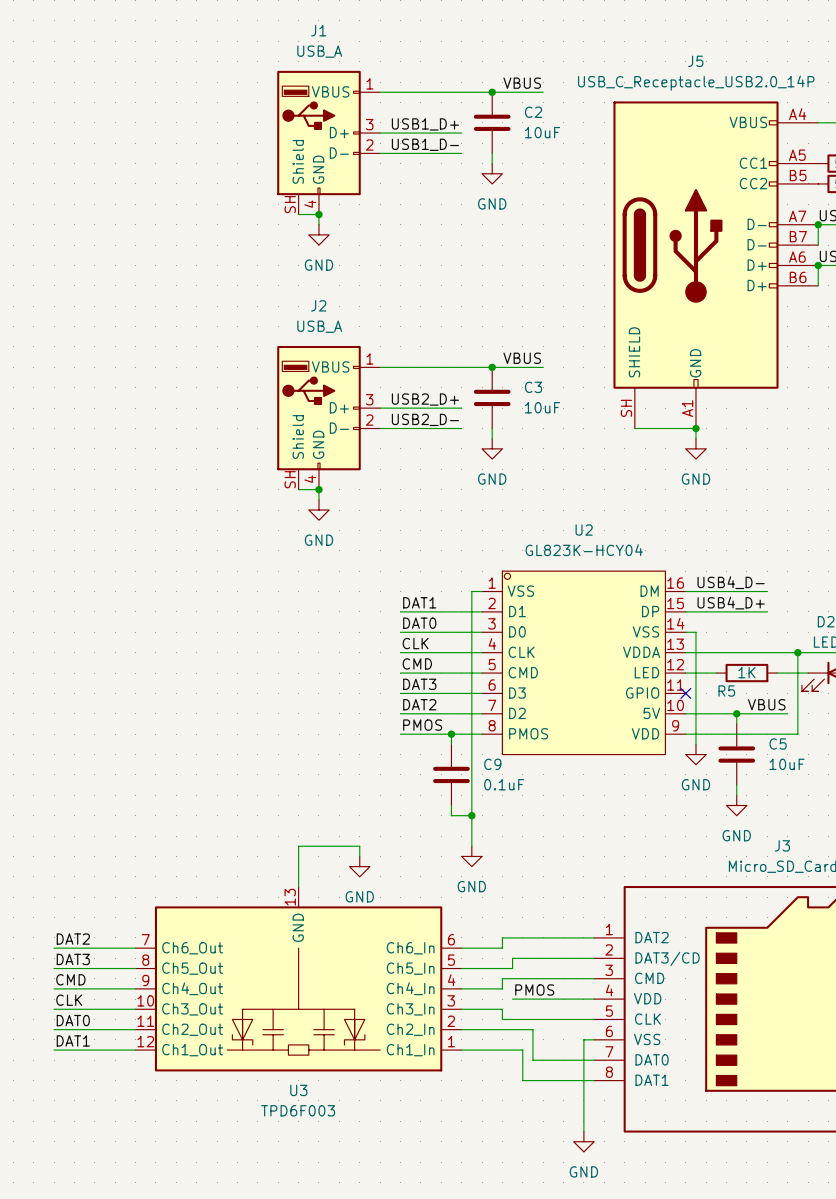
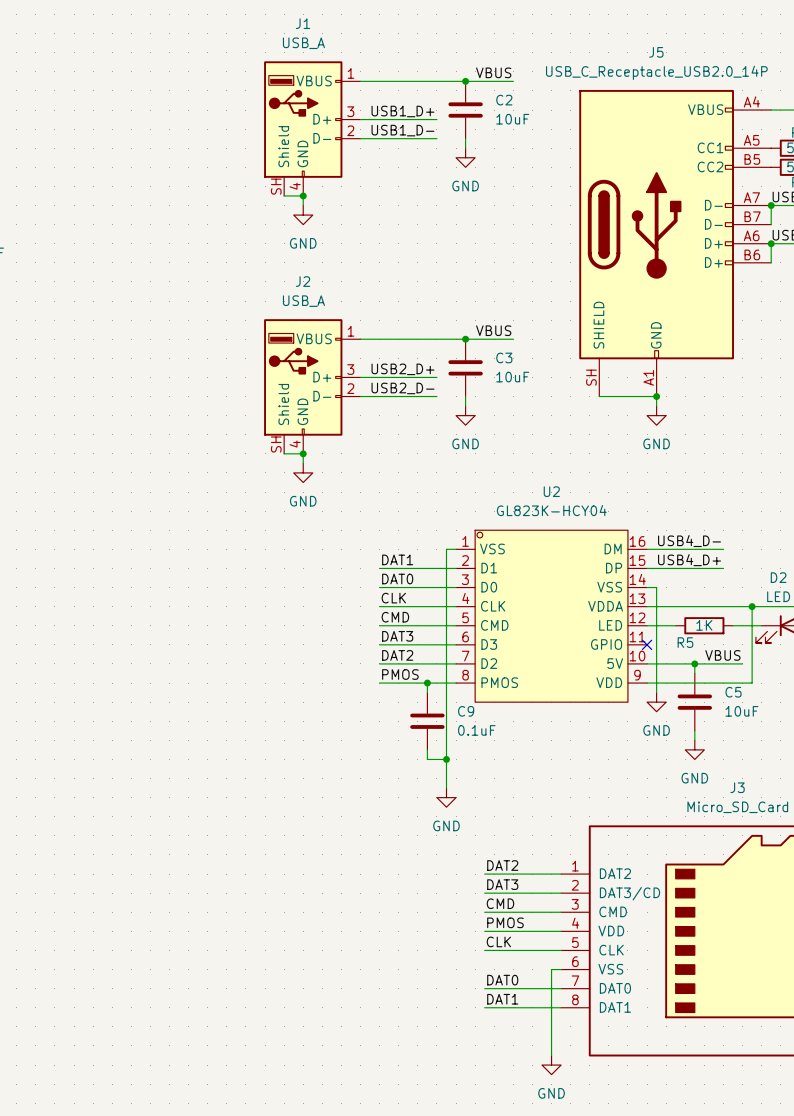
wire: (359, 856) (359, 846) (298, 846) (298, 887) -> none
power symbol: GND (359, 866) -> none
label: none -> DAT2 (502, 865)
wire: (512, 937) (502, 937) (502, 948) (461, 948) -> none
label: DAT2 (73, 939) -> none
wire: (54, 948) (135, 948) -> none
label: none -> DAT3 (502, 884)
wire: (512, 958) (512, 968) (461, 968) -> none
label: DAT3 (73, 959) -> none
wire: (54, 968) (135, 968) -> none
label: none -> CMD (500, 903)
wire: (512, 978) (502, 978) (502, 988) (461, 988) -> none
label: CMD (70, 979) -> none
U3: TPD6F003 (298, 979) -> none
wire: (54, 988) (135, 988) -> none
label: CLK (69, 1000) -> none
wire: (54, 1009) (135, 1009) -> none
wire: (461, 1009) (502, 1009) (502, 1019) (512, 1019) -> none
label: none -> CLK (498, 941)
label: DAT0 (73, 1020) -> none
wire: (54, 1029) (135, 1029) -> none
wire: (461, 1029) (532, 1029) (532, 1060) -> (484, 988) (503, 988)
label: DAT1 (73, 1040) -> none
wire: (54, 1050) (135, 1050) -> none
wire: (461, 1050) (522, 1050) (522, 1080) -> (484, 1007) (494, 1007)
label: none -> DAT0 (502, 980)
label: none -> DAT1 (502, 999)

